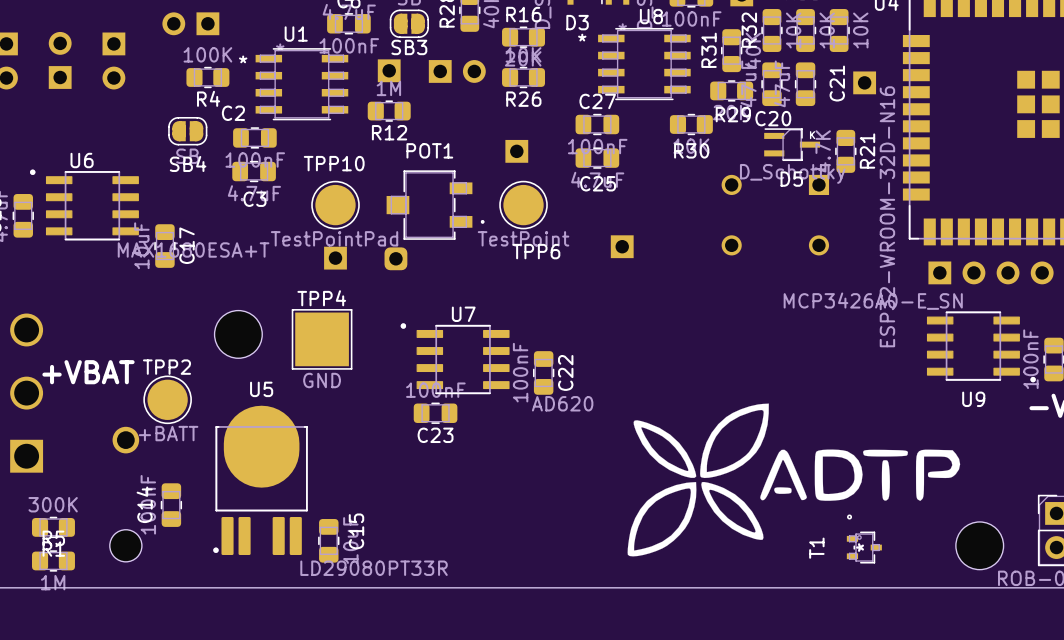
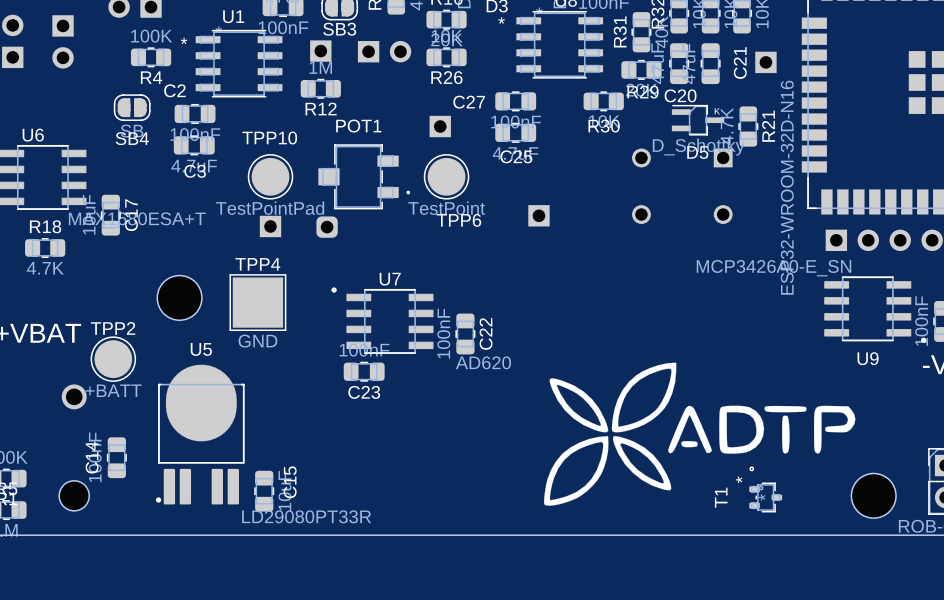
C27 name position: C27 (597, 101) -> C27 (469, 102)
R18: none -> 4.7K (45, 247)
T1 footprint: [846, 514, 882, 564] -> [749, 466, 783, 513]

